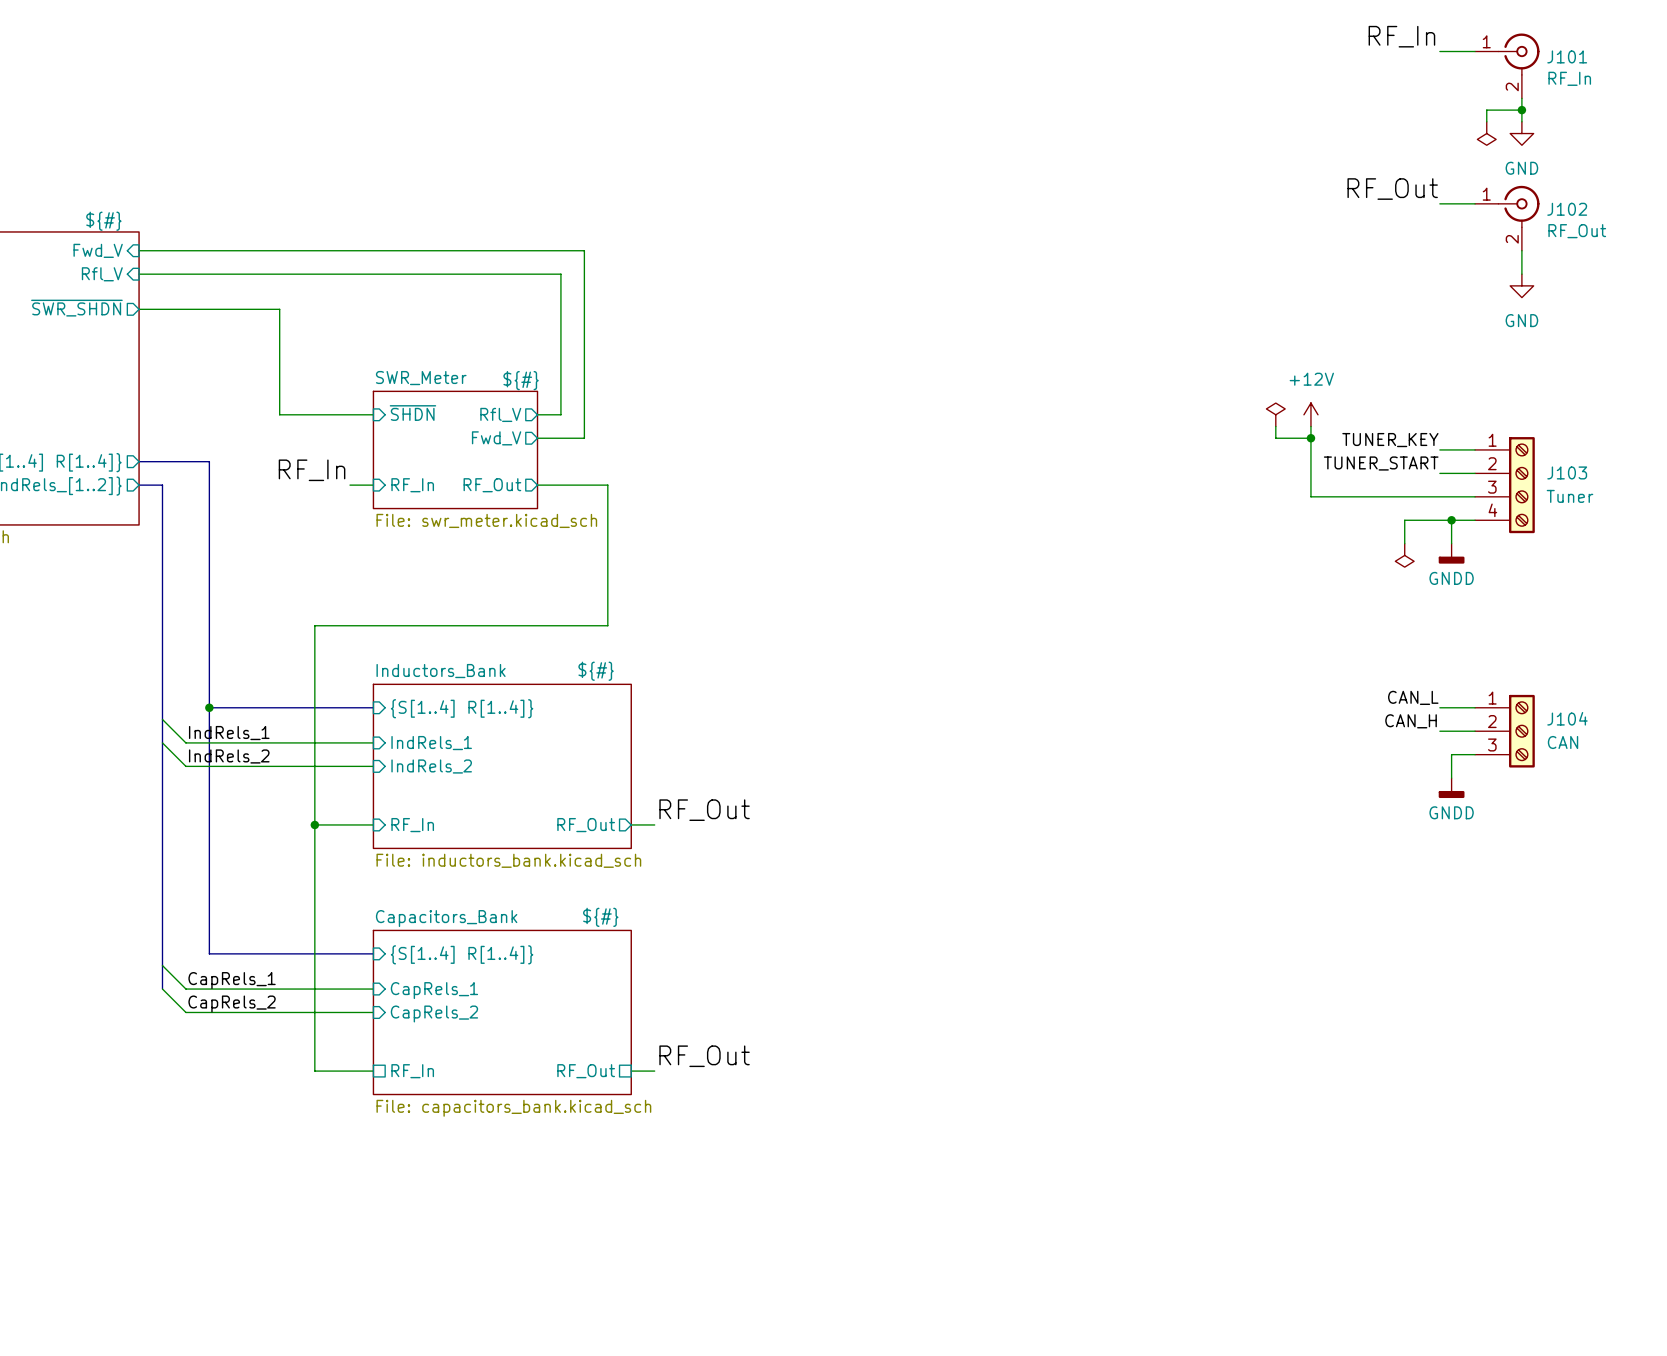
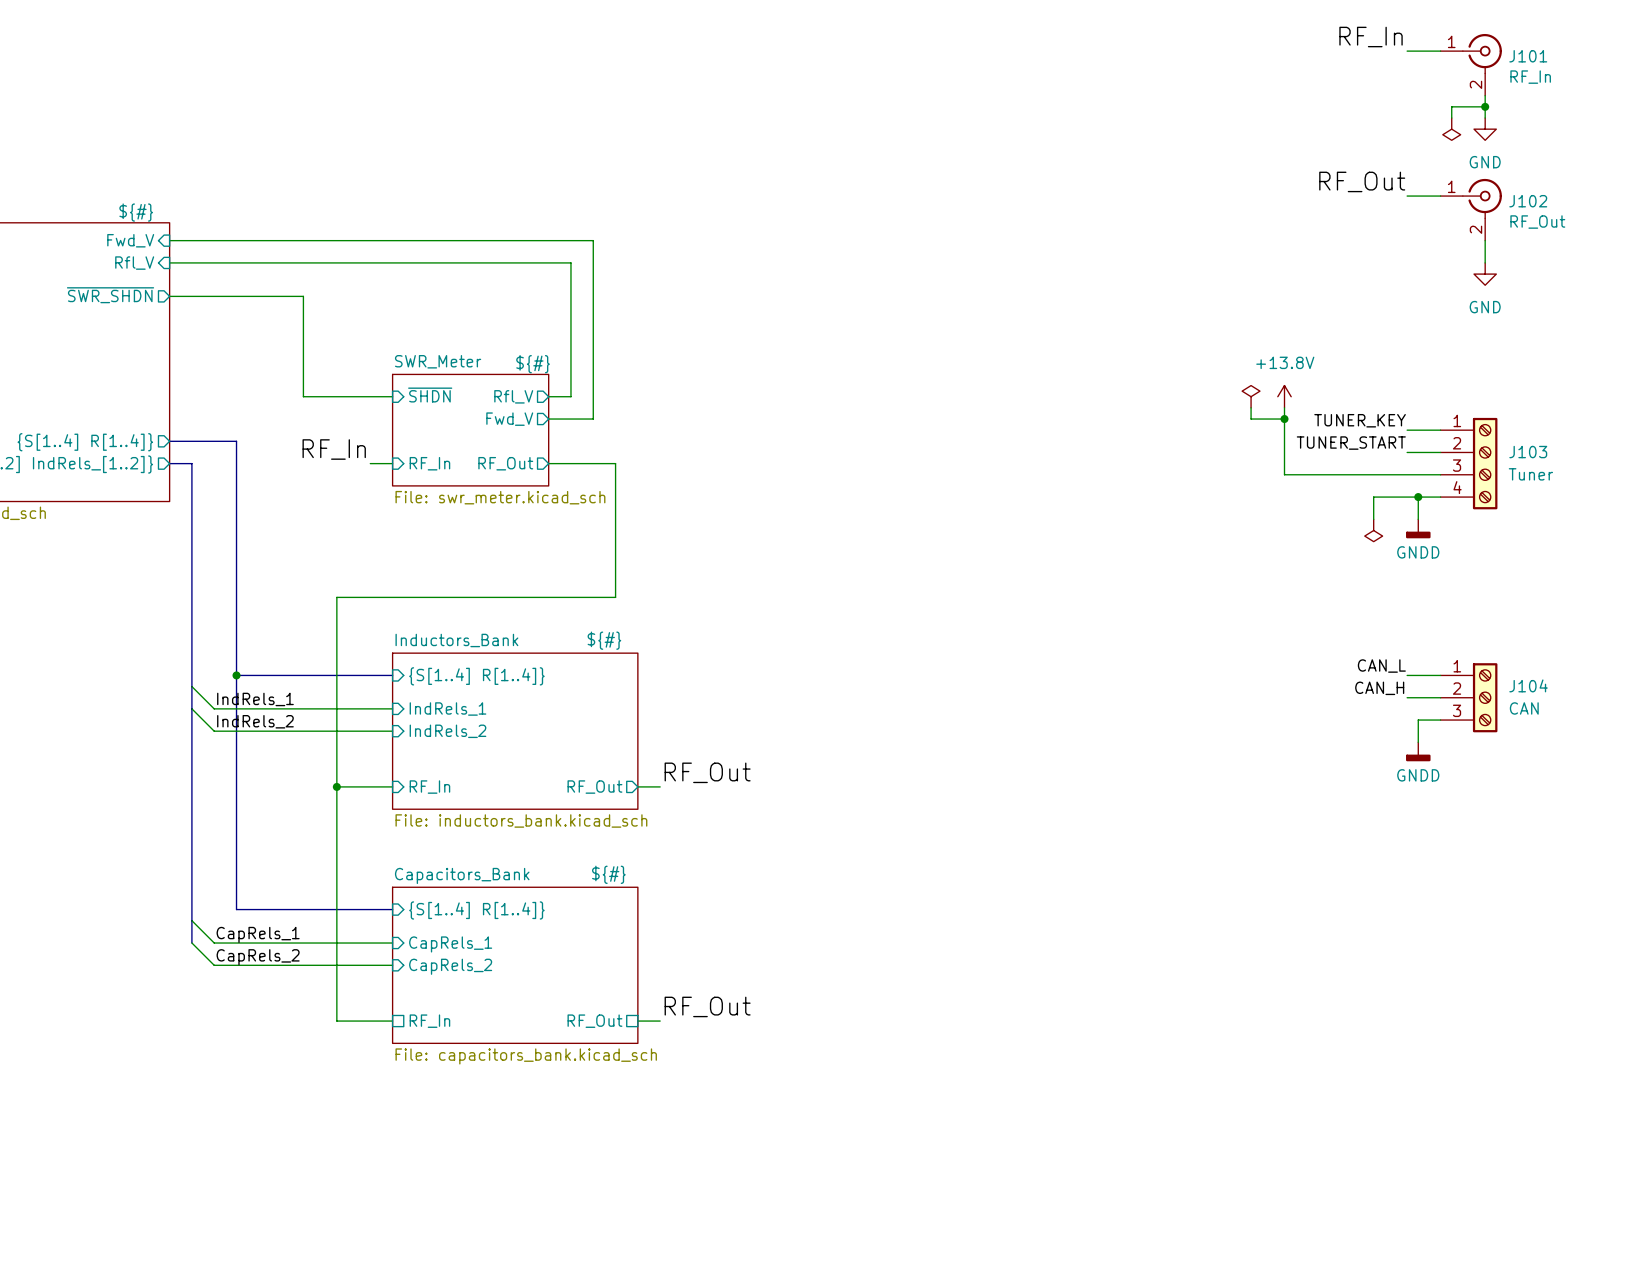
power symbol: +12V (1310, 414) -> +13.8V (1284, 396)

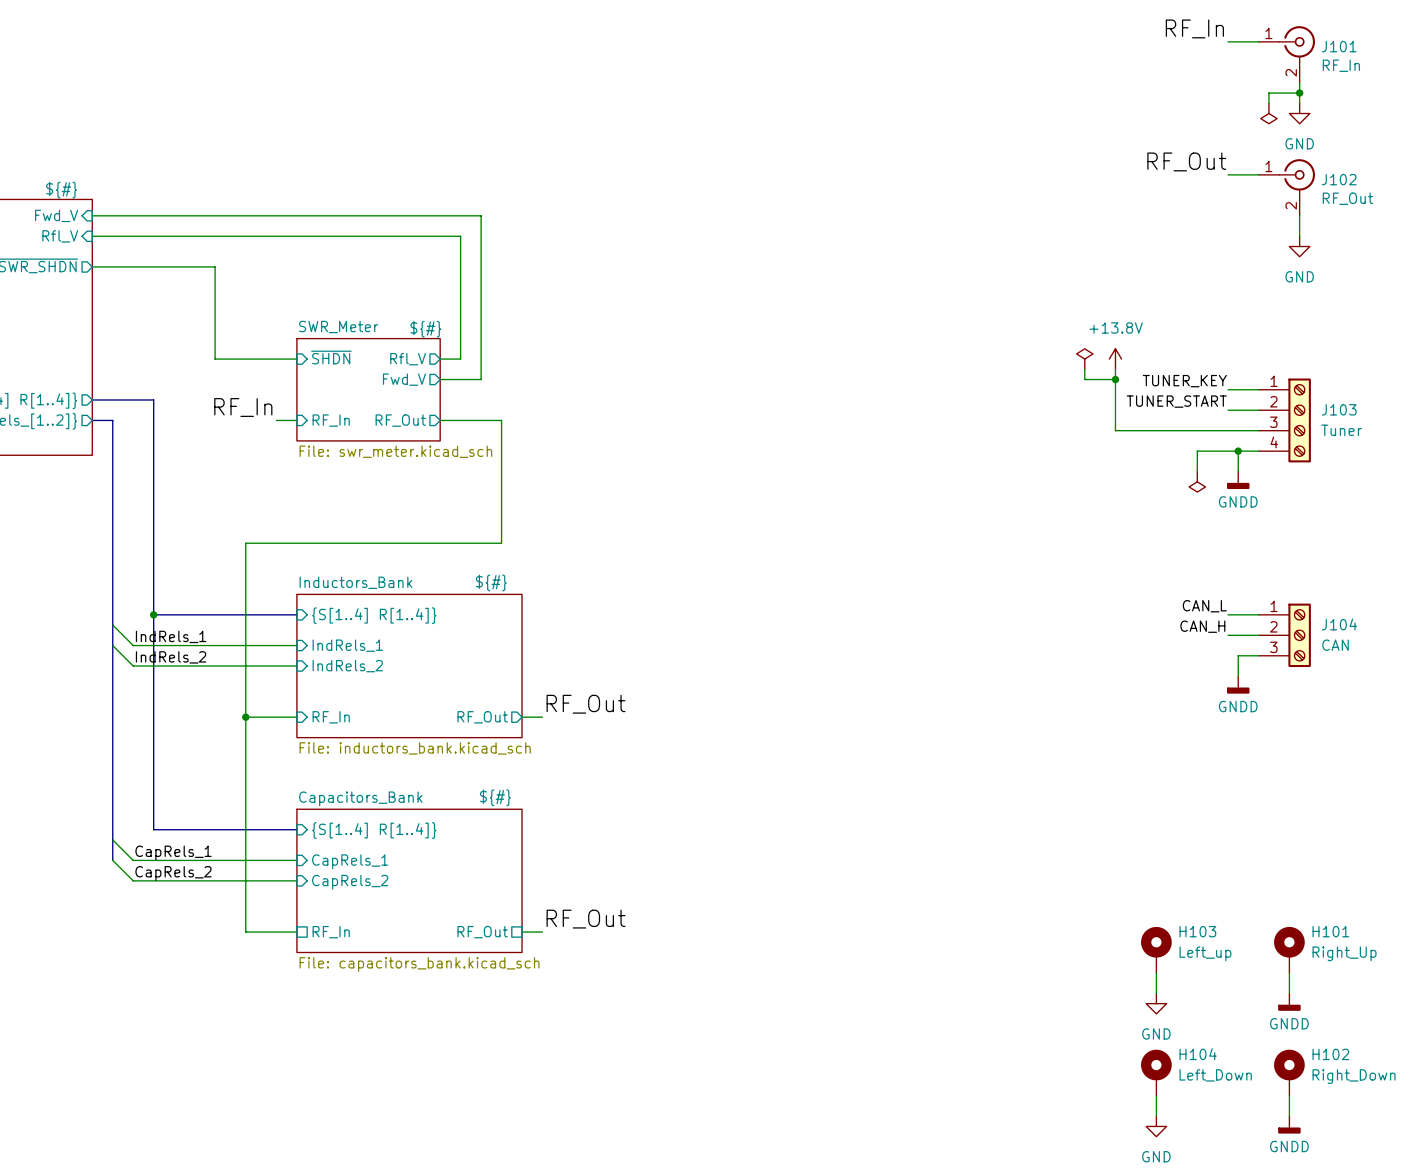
H103: none -> Left_up (1156, 949)
H101: none -> Right_Up (1289, 949)
wire: none -> (1156, 972) (1156, 993)
wire: none -> (1289, 972) (1289, 993)
power symbol: none -> GNDD (1289, 1002)
power symbol: none -> GND (1156, 1003)
H104: none -> Left_Down (1156, 1072)
H102: none -> Right_Down (1289, 1072)
wire: none -> (1156, 1095) (1156, 1116)
wire: none -> (1289, 1095) (1289, 1116)
power symbol: none -> GNDD (1289, 1124)
power symbol: none -> GND (1156, 1126)

